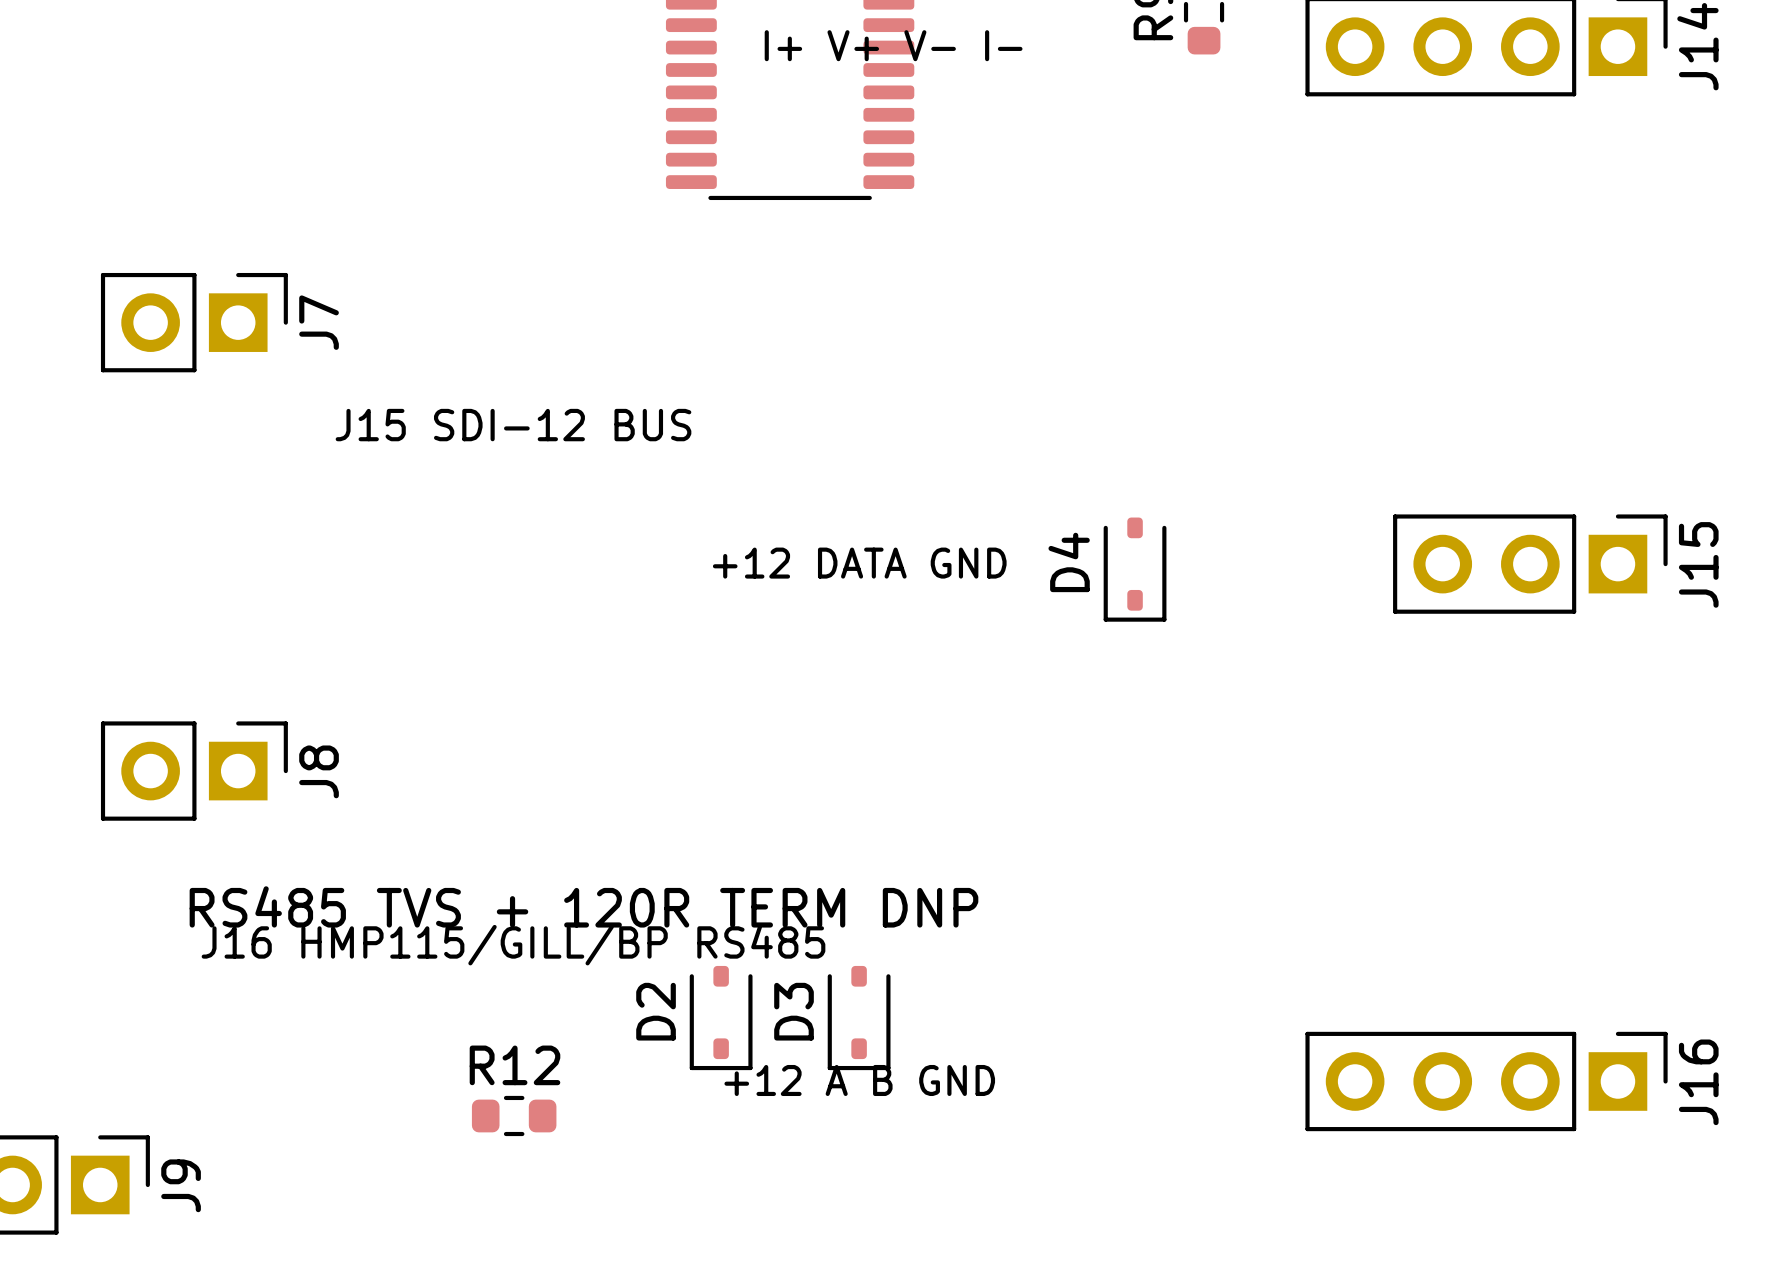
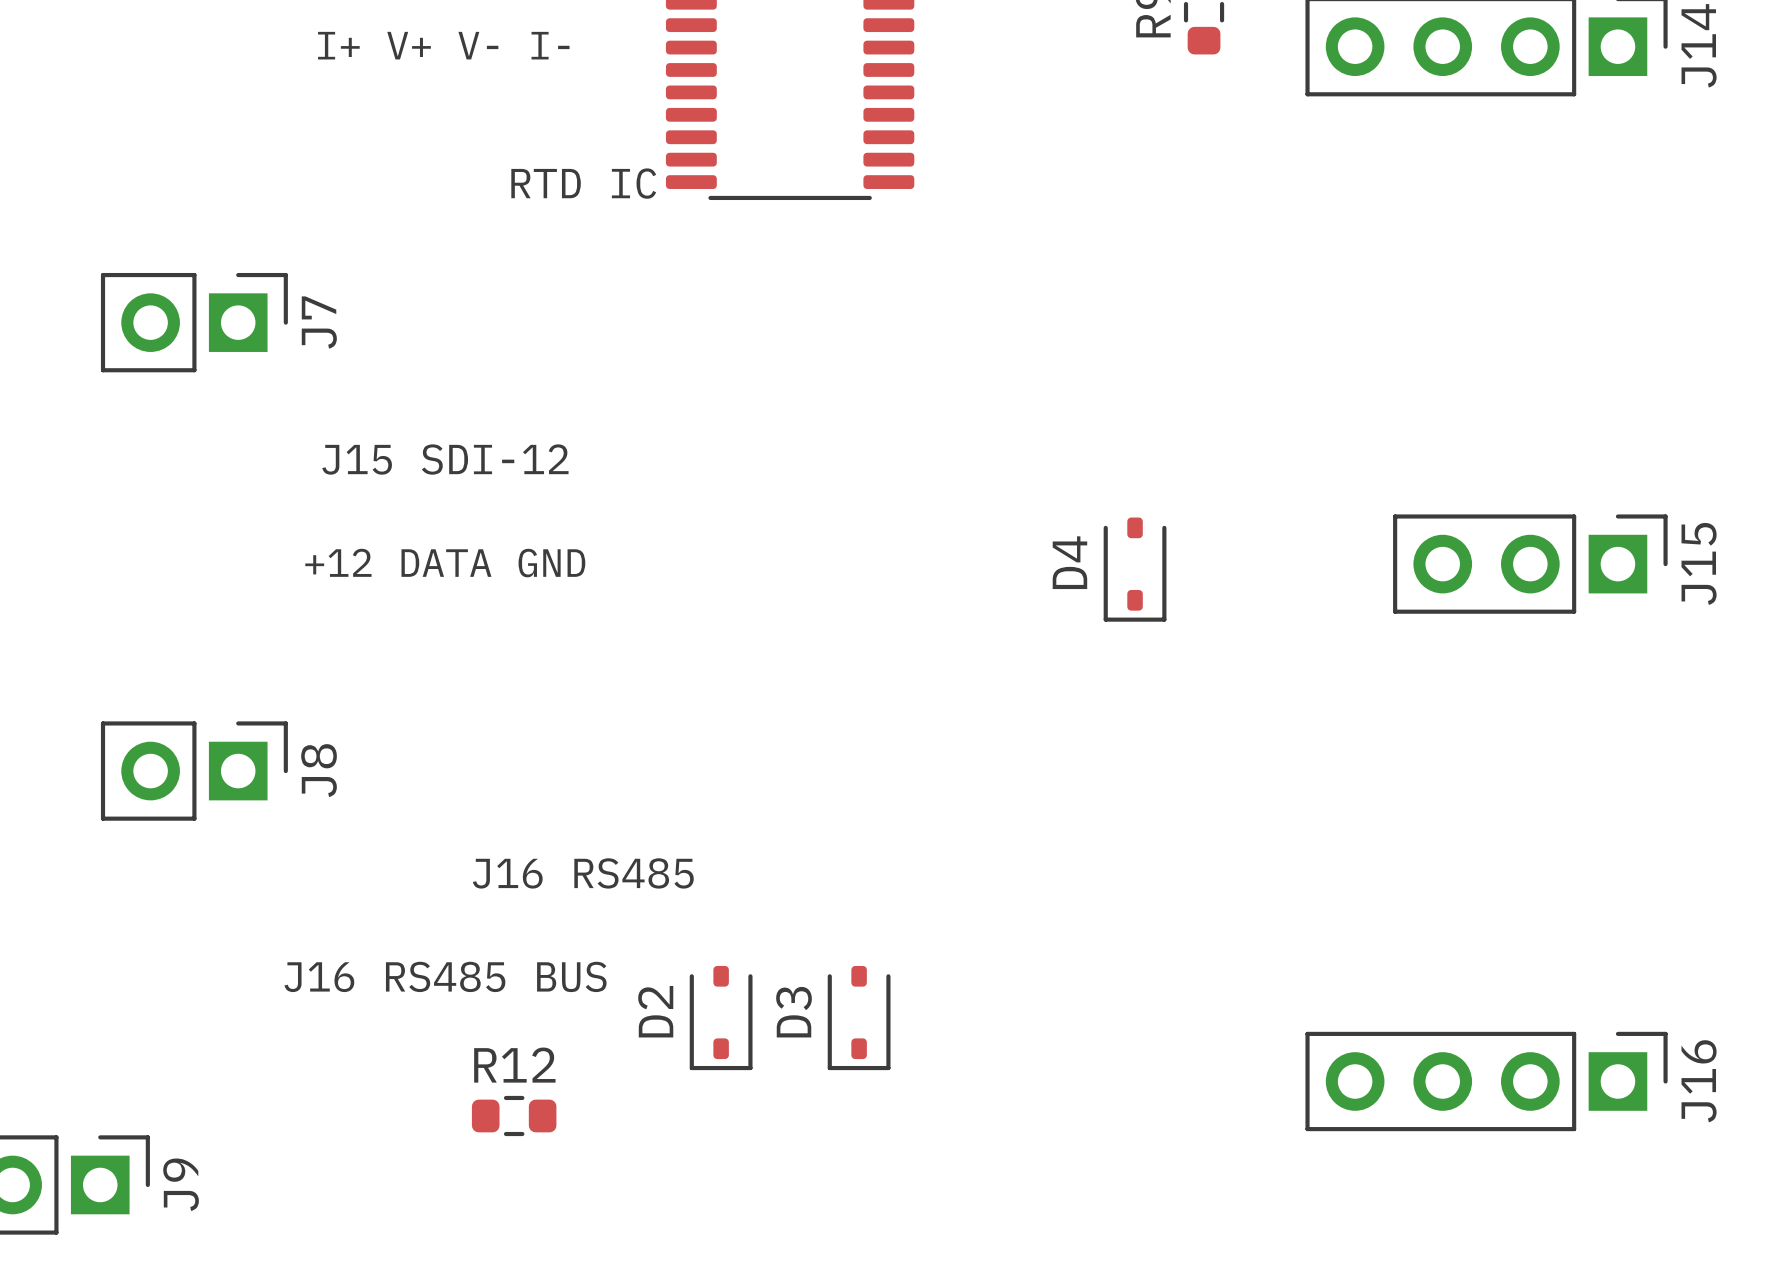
text position: I+ V+ V- I- (893, 45) -> I+ V+ V- I- (443, 45)
text: none -> RTD IC (583, 183)
text: J15 SDI-12 BUS (513, 425) -> J15 SDI-12 (445, 459)
text position: +12 DATA GND (859, 563) -> +12 DATA GND (445, 563)
text: RS485 TVS + 120R TERM DNP (583, 906) -> J16 RS485 (583, 873)
text: J16 HMP115/GILL/BP RS485 (513, 945) -> none
text: none -> J16 RS485 BUS (445, 976)
text: +12 A B GND (859, 1080) -> none

